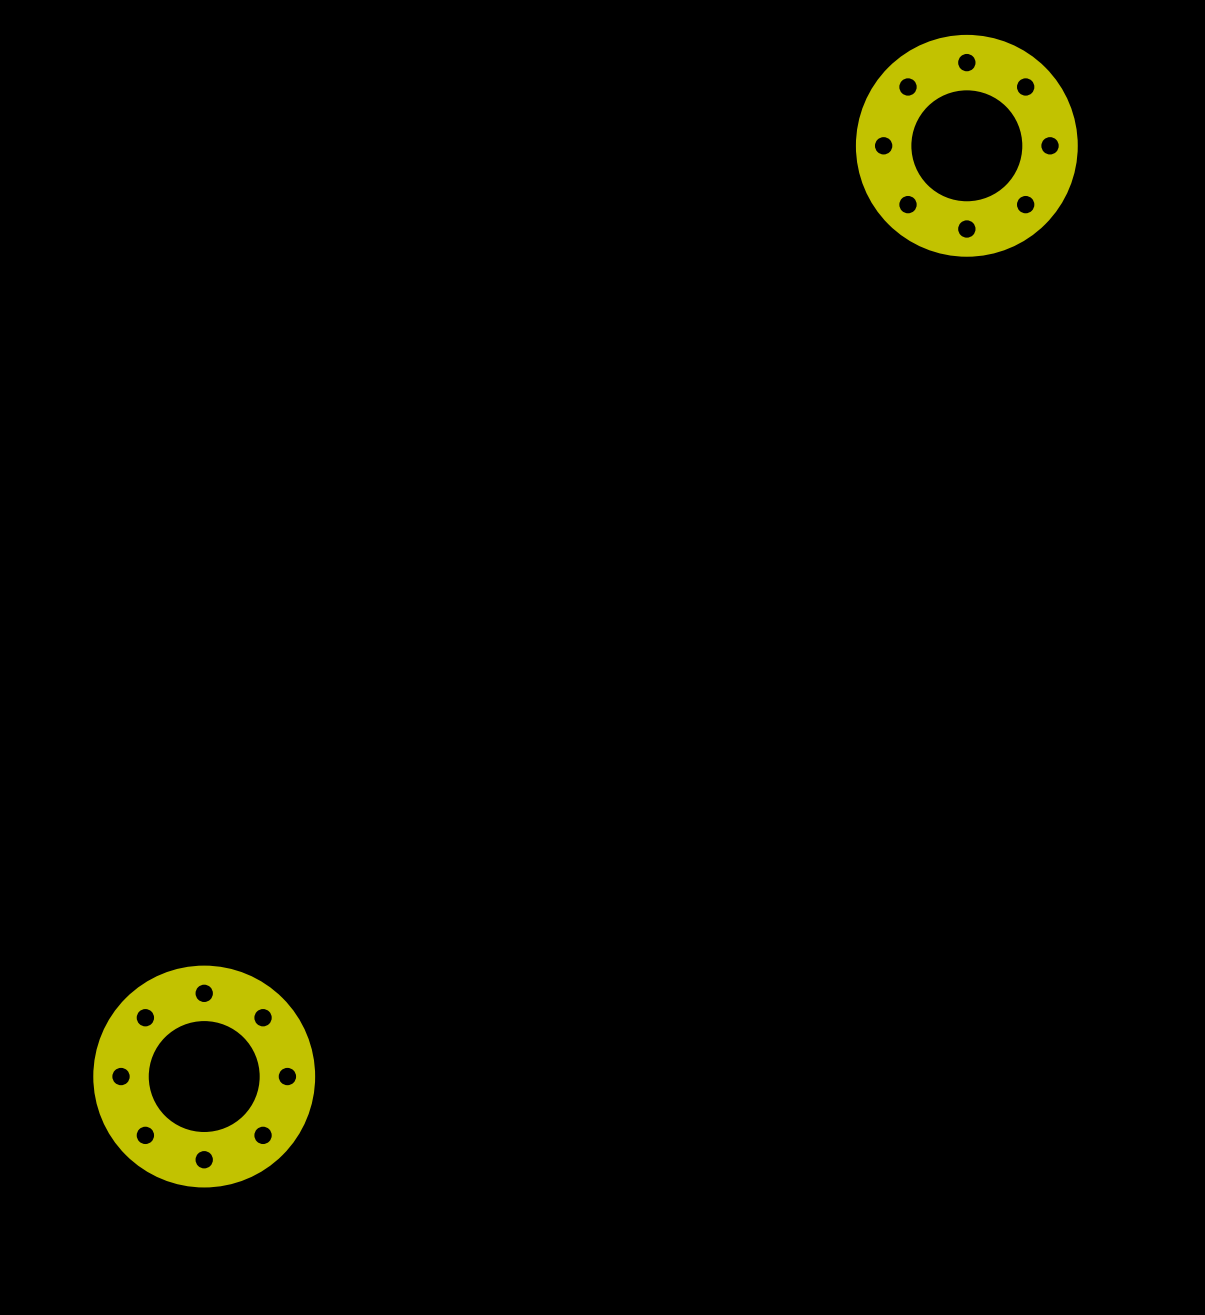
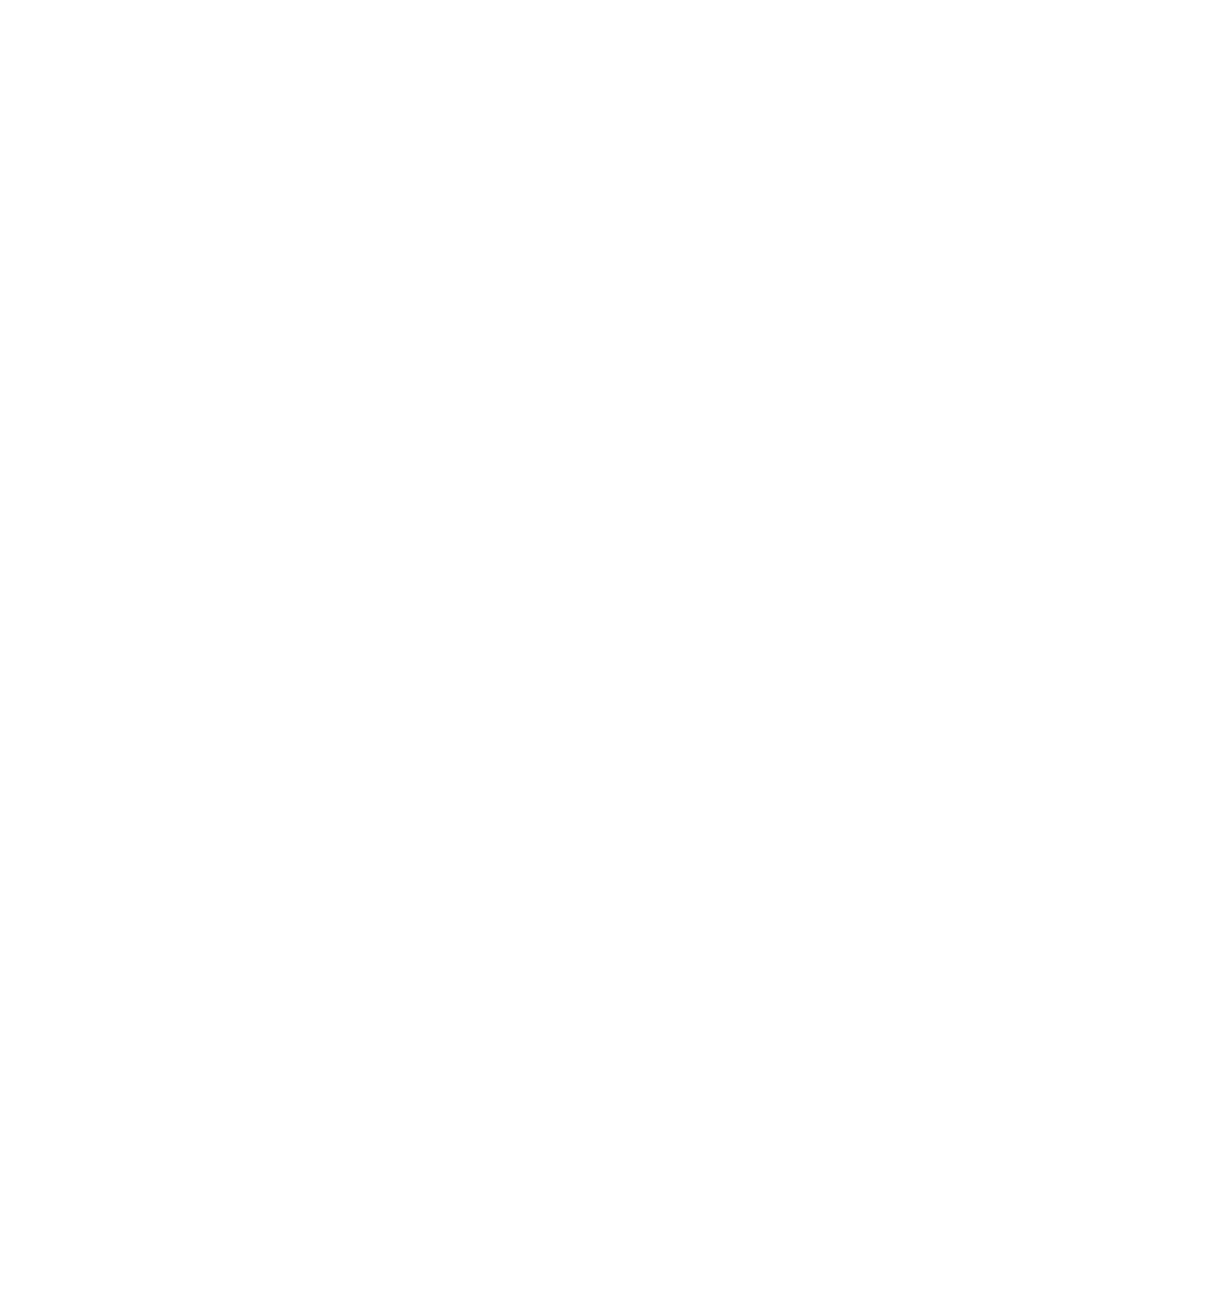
part: (966, 145) -> none
part: (204, 1076) -> none

